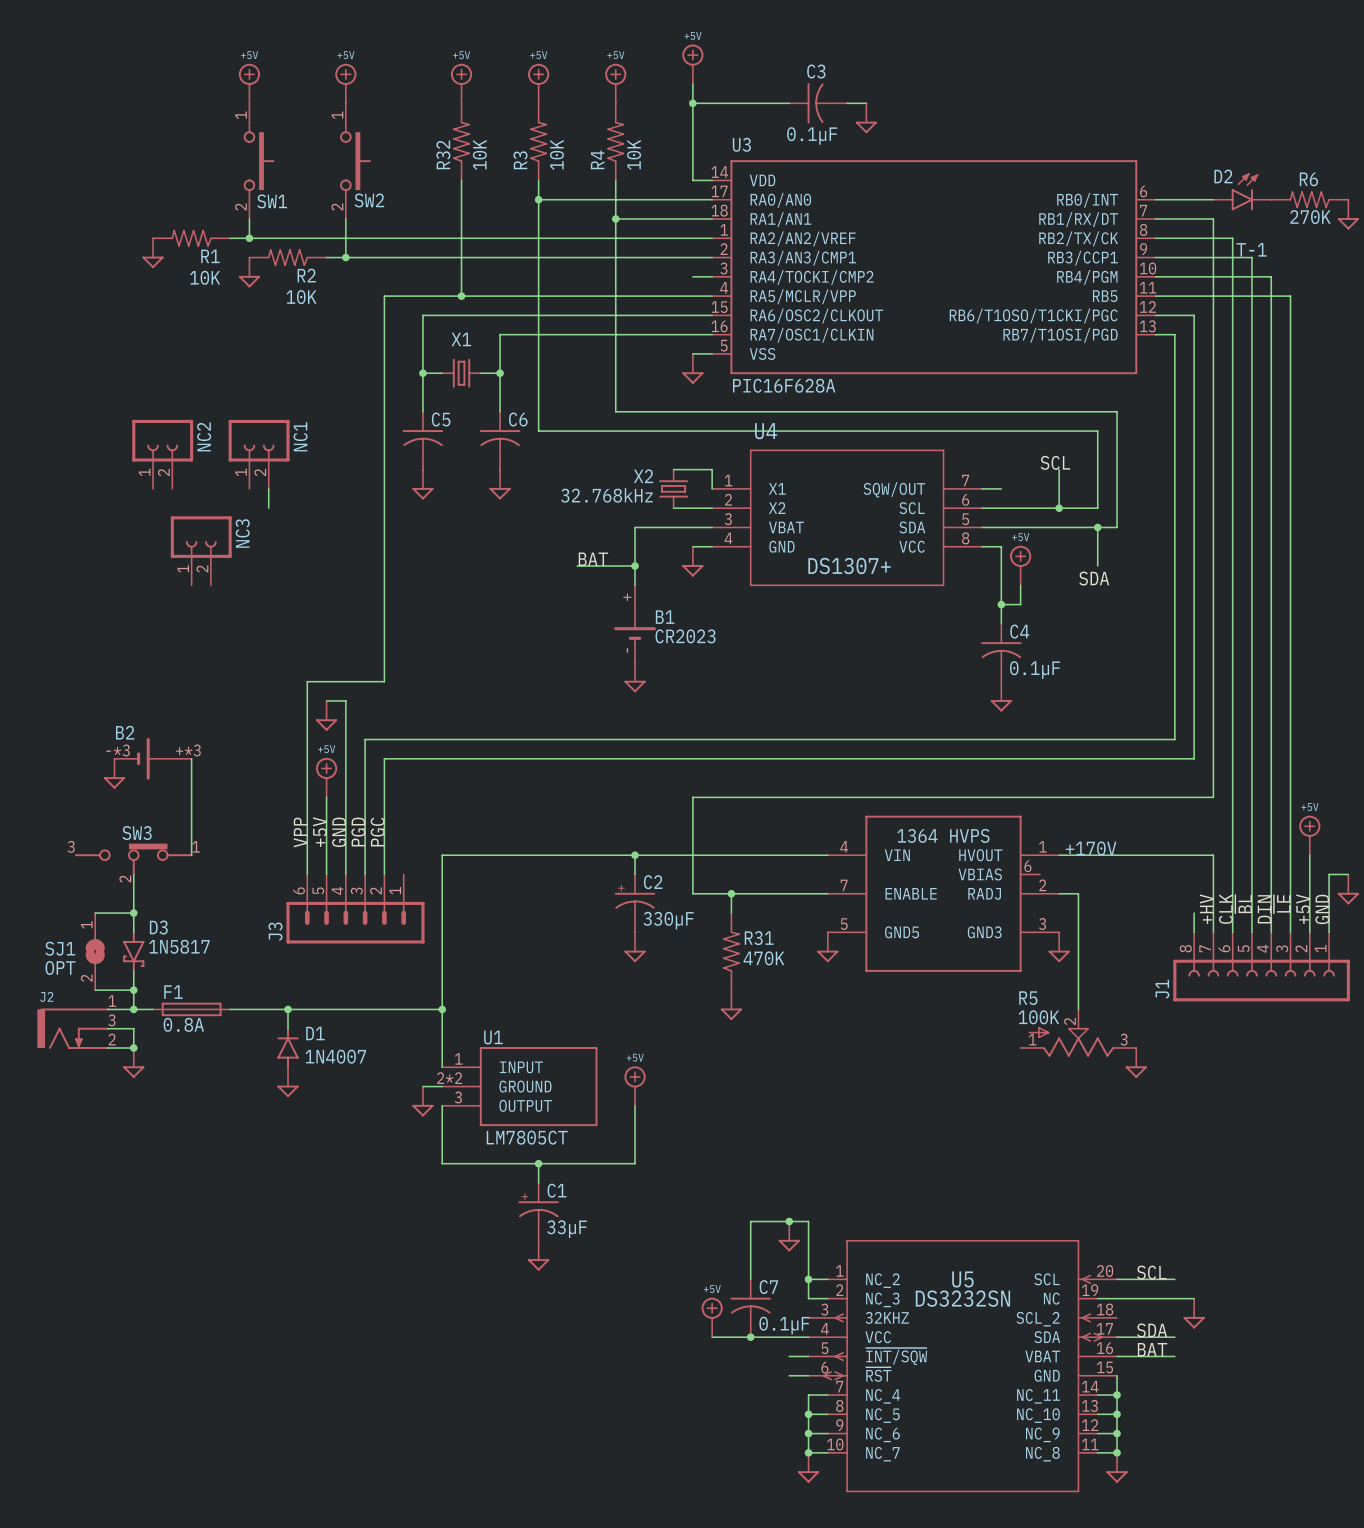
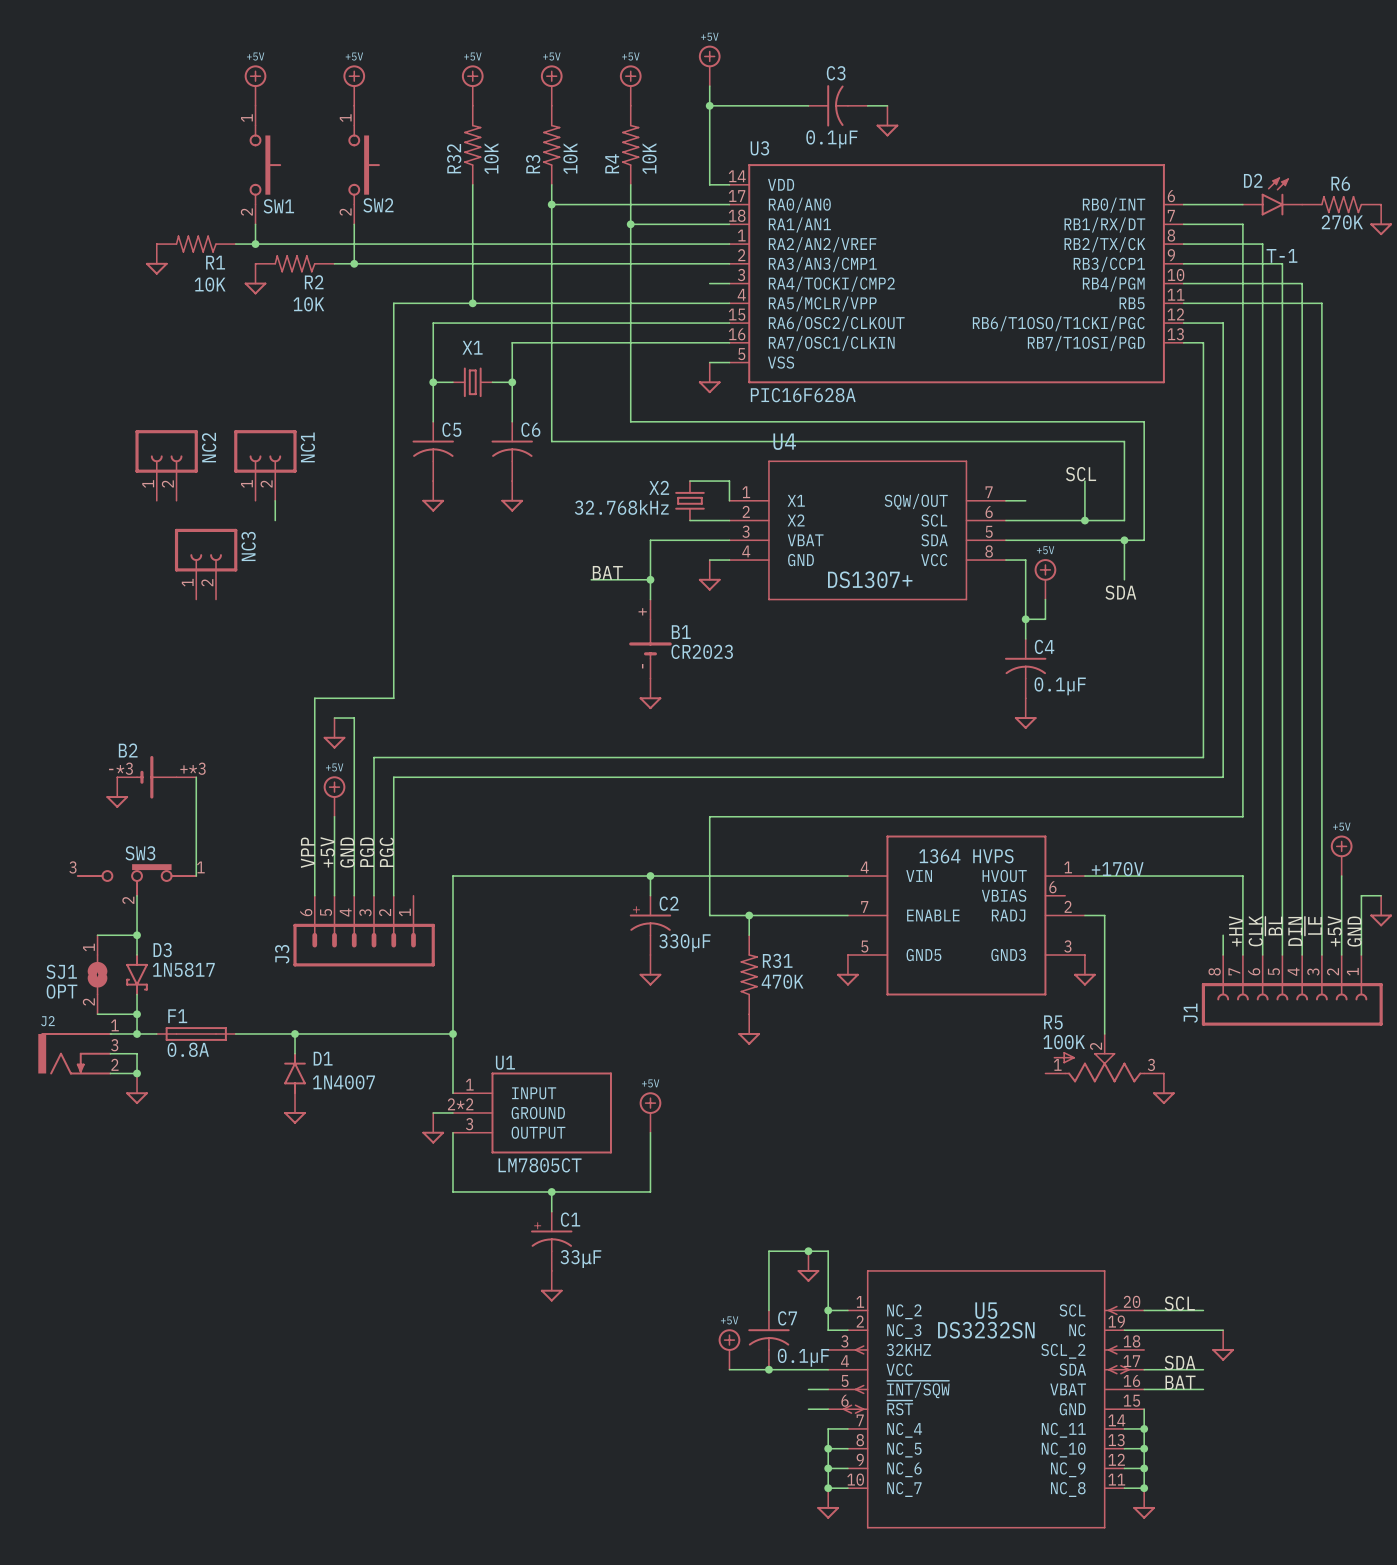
C1 value: 33µF (567, 1229) -> 33μF (580, 1259)

